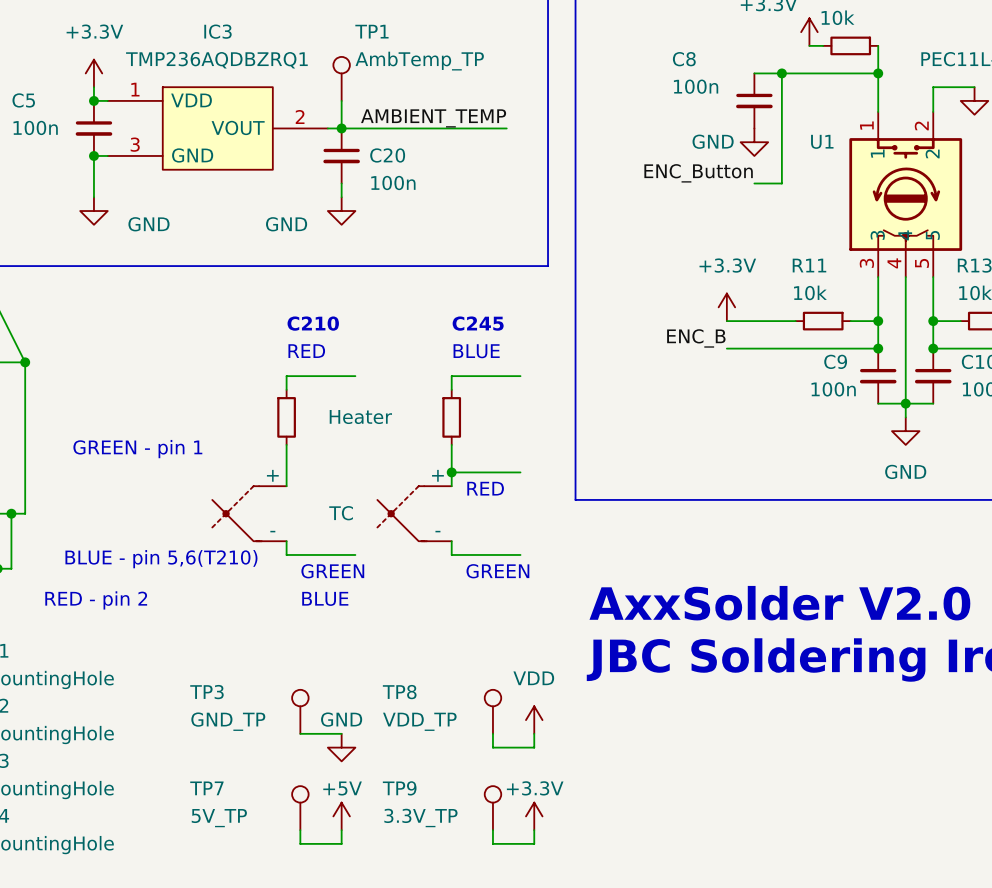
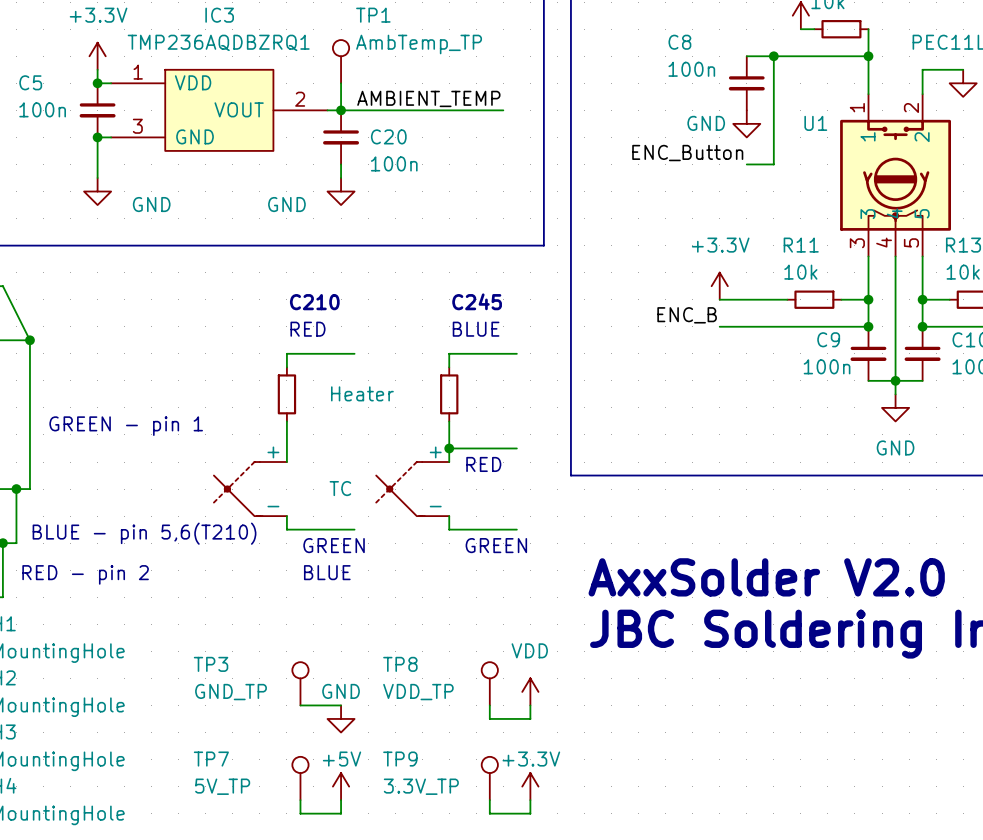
U1 symbol: [849, 111, 963, 278] -> [840, 94, 952, 257]

